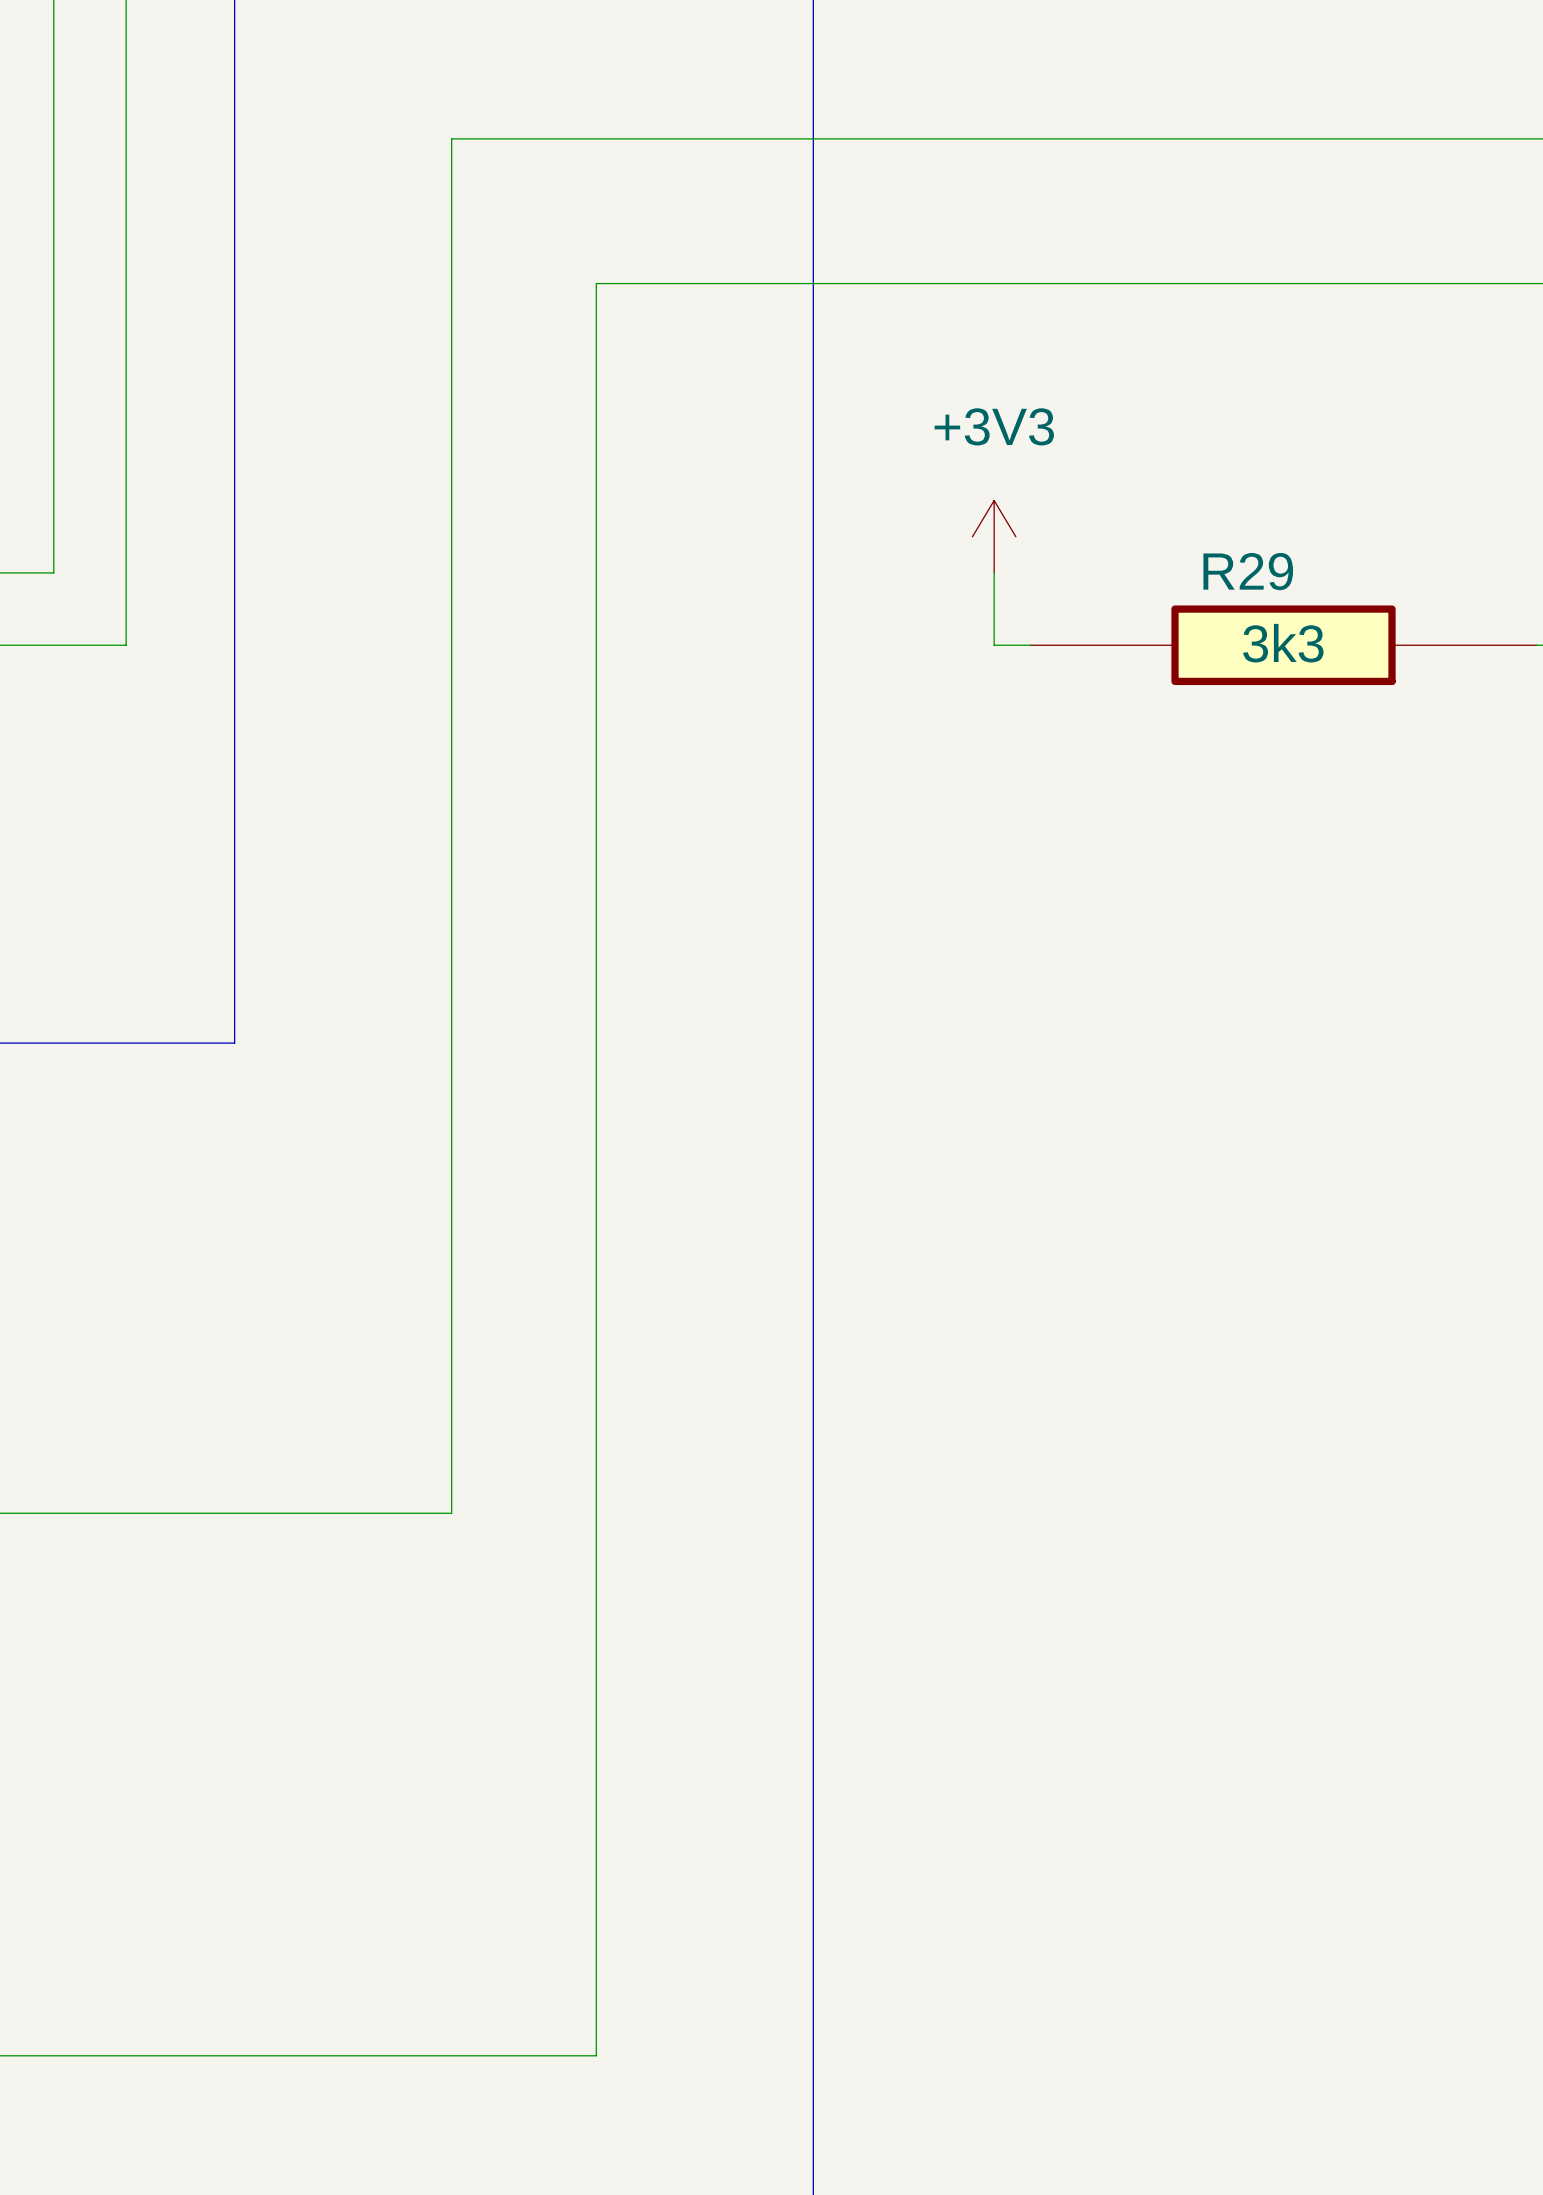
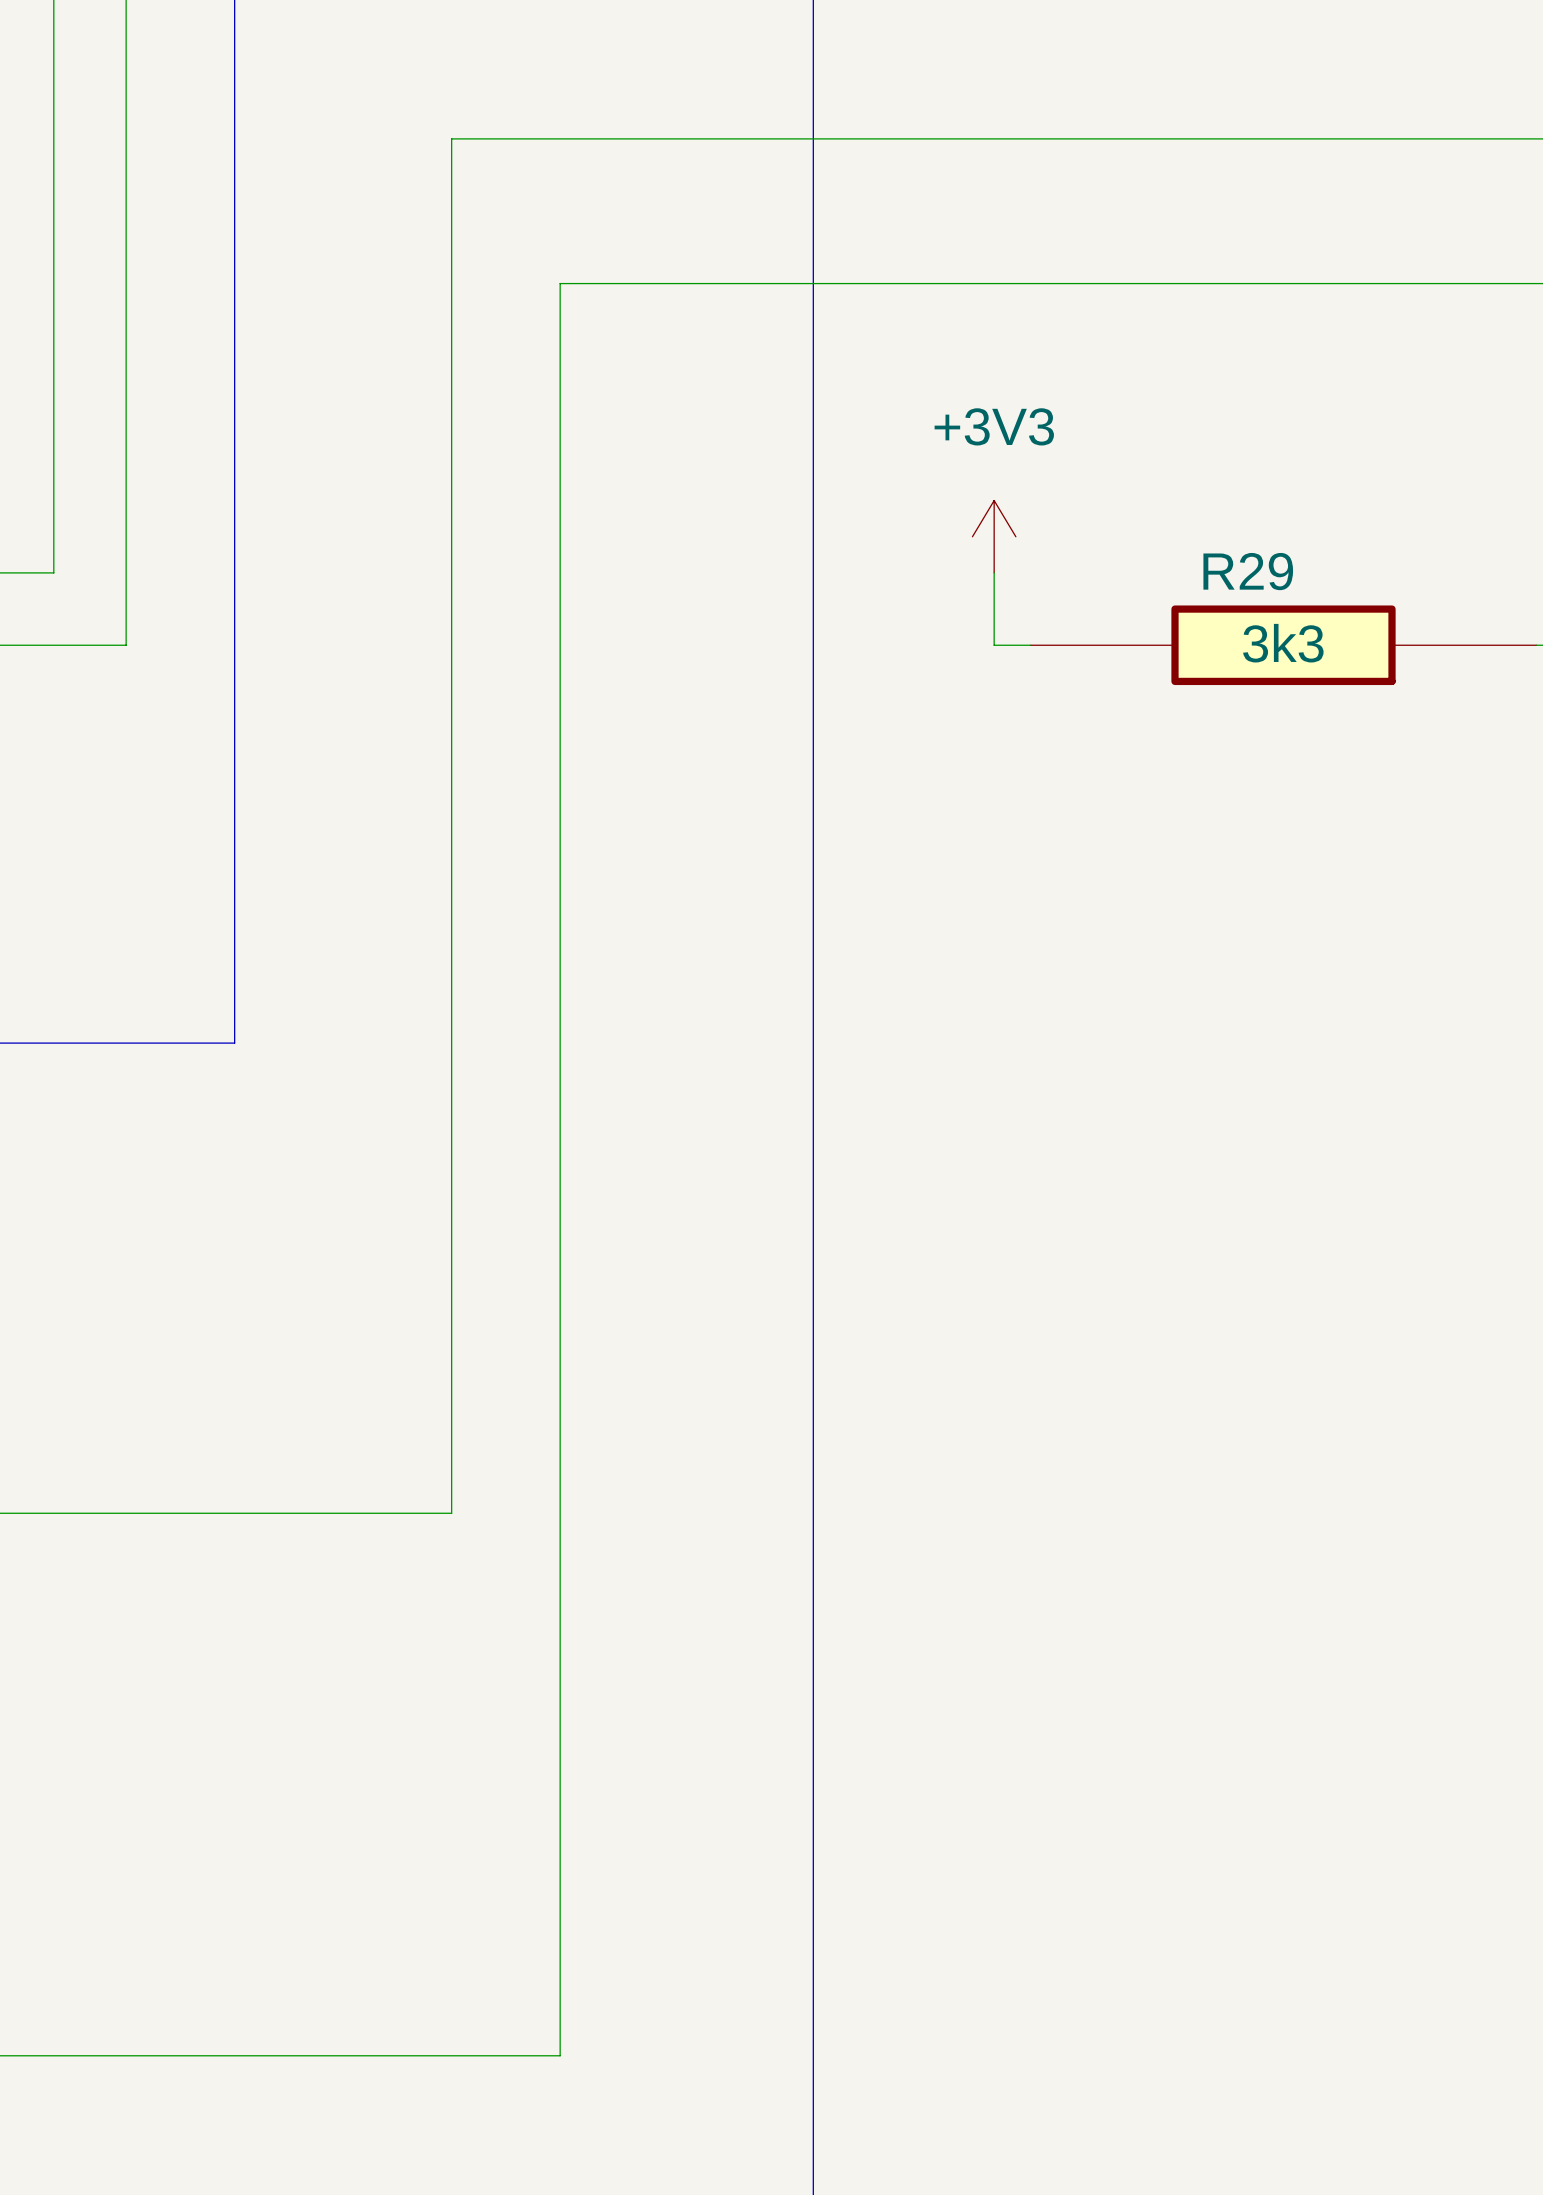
wire: (596, 283) (596, 2055) (560, 2055) -> (596, 283) (560, 283) (560, 2055)

